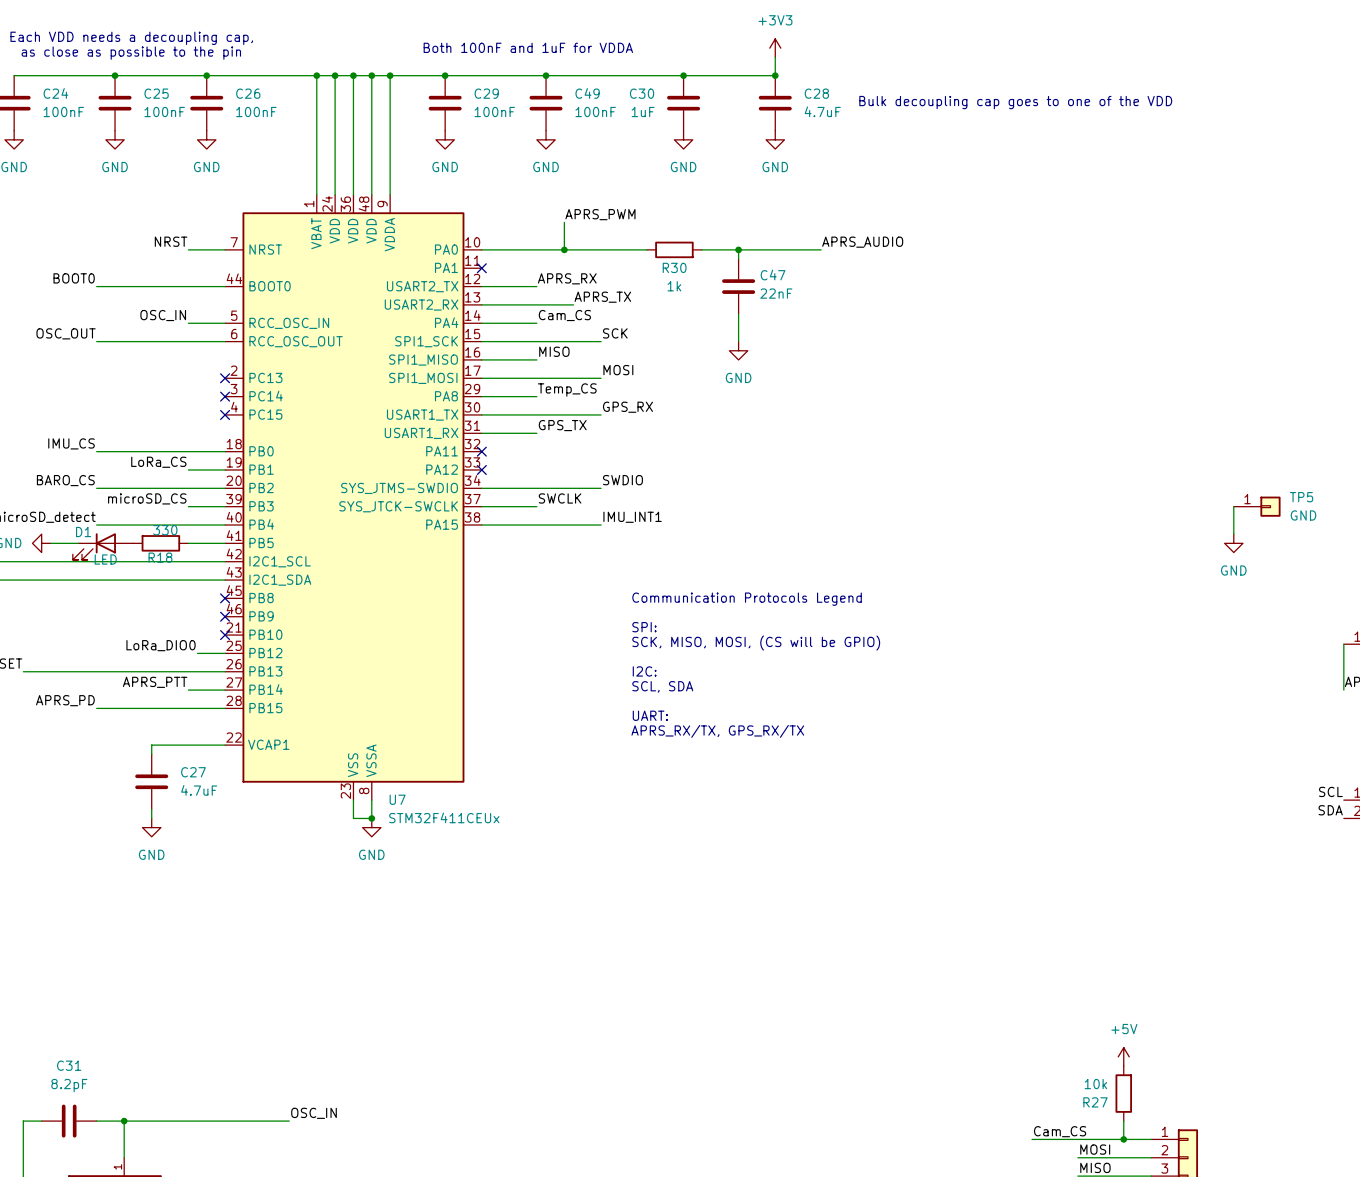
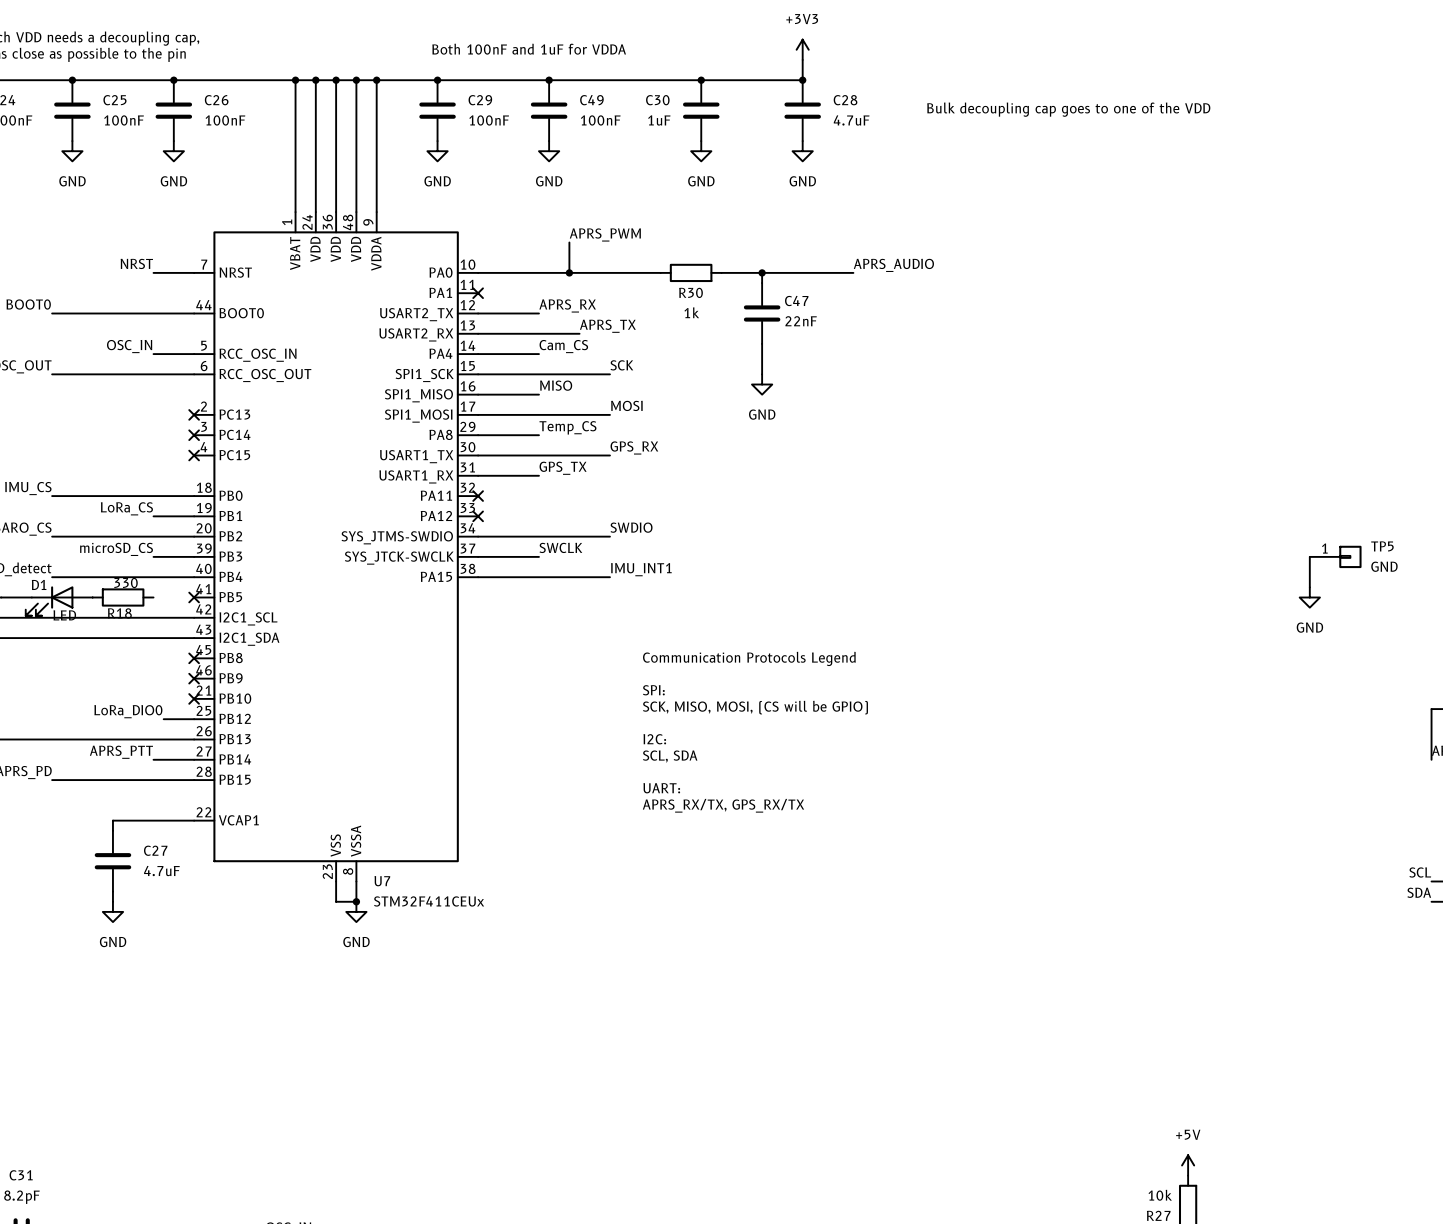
wire: (188, 543) (225, 543) -> none
no-connect mark: none -> (194, 597)

